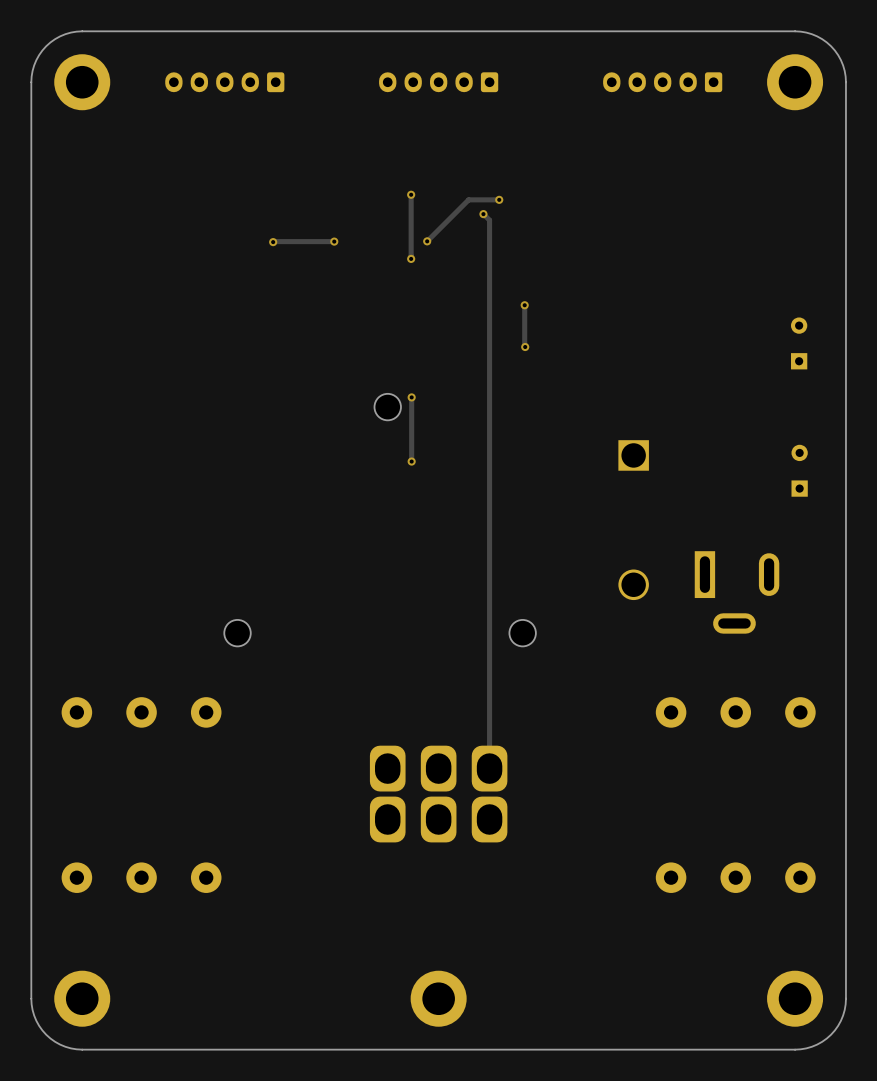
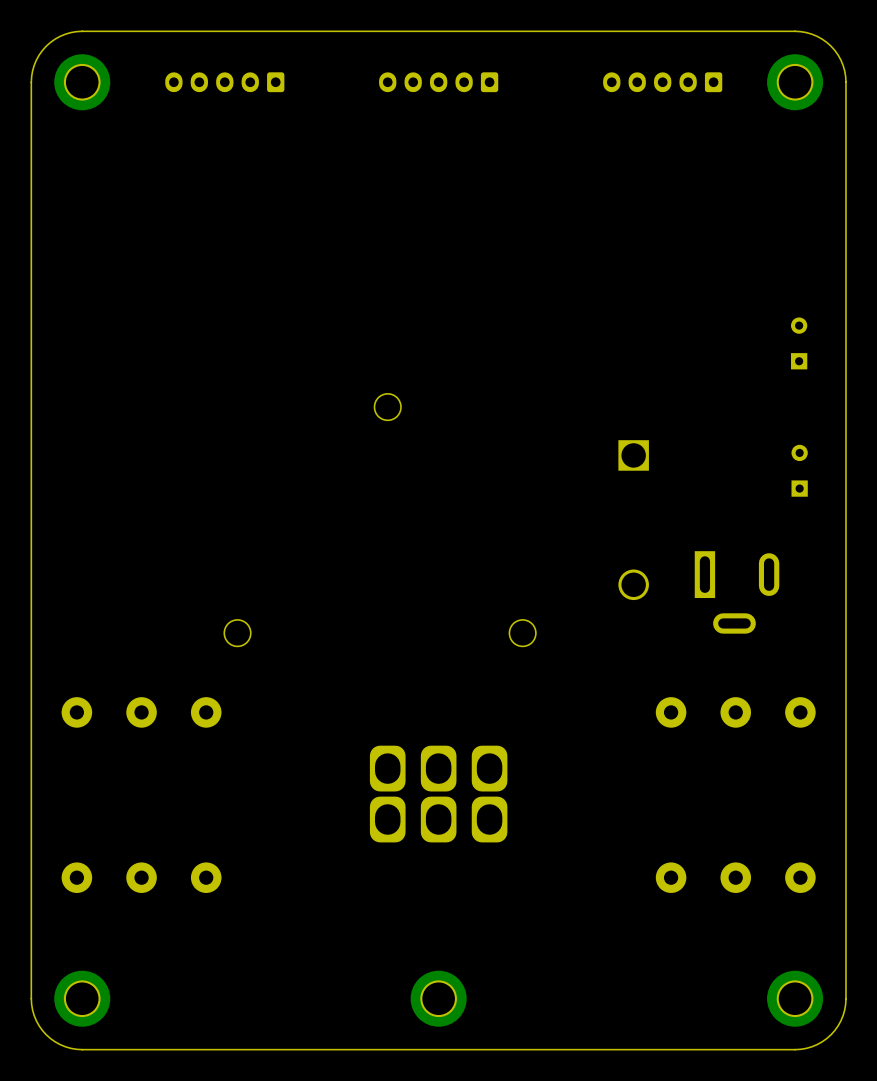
track: (411, 194) (411, 258) -> none
via: (411, 194) -> none
track: (499, 199) (468, 199) (427, 241) -> none
via: (499, 199) -> none
track: (483, 214) (489, 220) (489, 768) -> none
via: (483, 214) -> none
track: (334, 241) (273, 242) -> none
via: (334, 241) -> none
via: (427, 241) -> none
via: (273, 242) -> none
via: (411, 258) -> none
track: (524, 305) (525, 347) -> none
via: (524, 305) -> none
via: (525, 347) -> none
track: (411, 397) (411, 461) -> none
via: (411, 397) -> none
via: (411, 461) -> none

